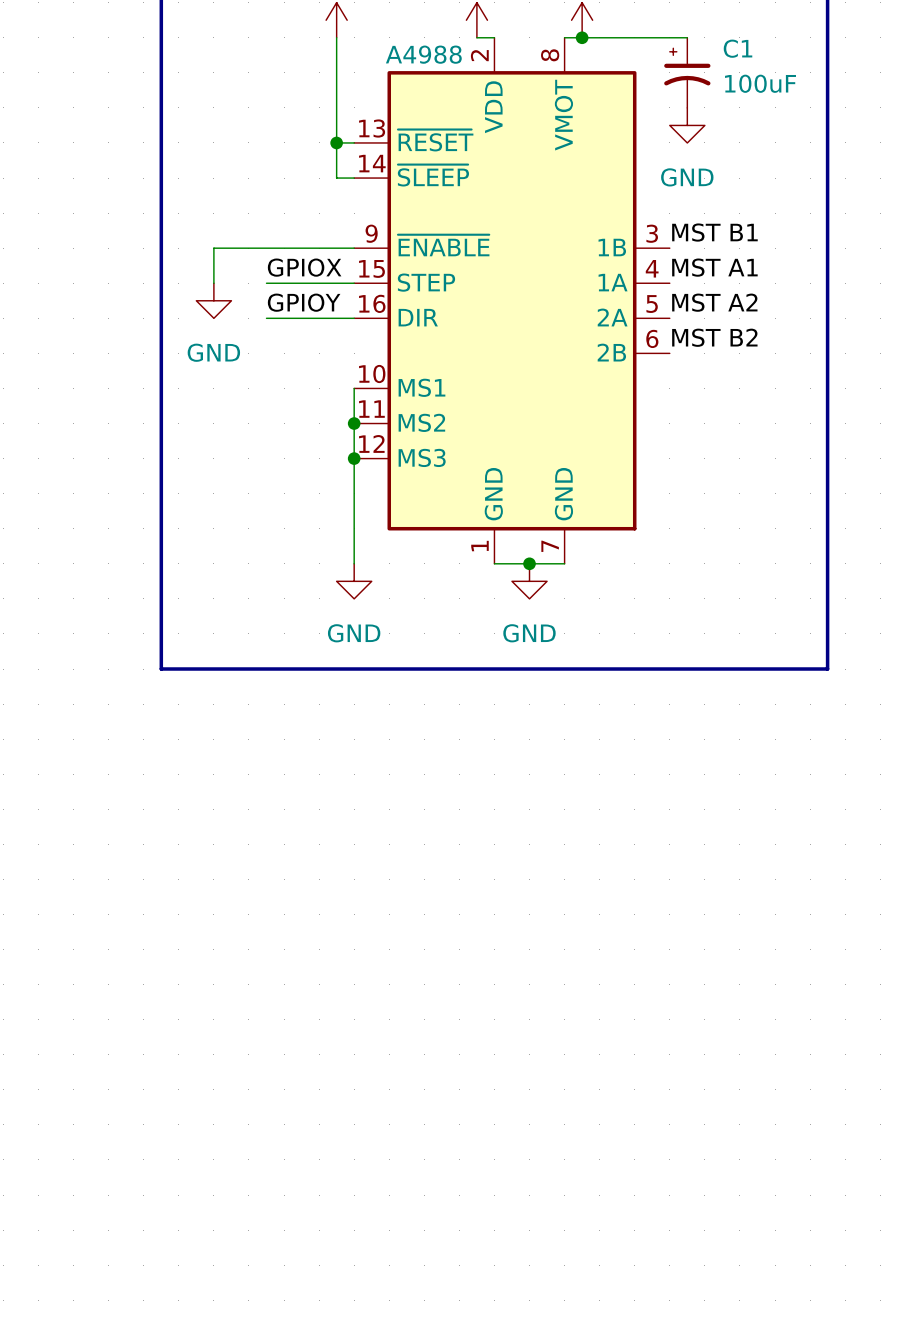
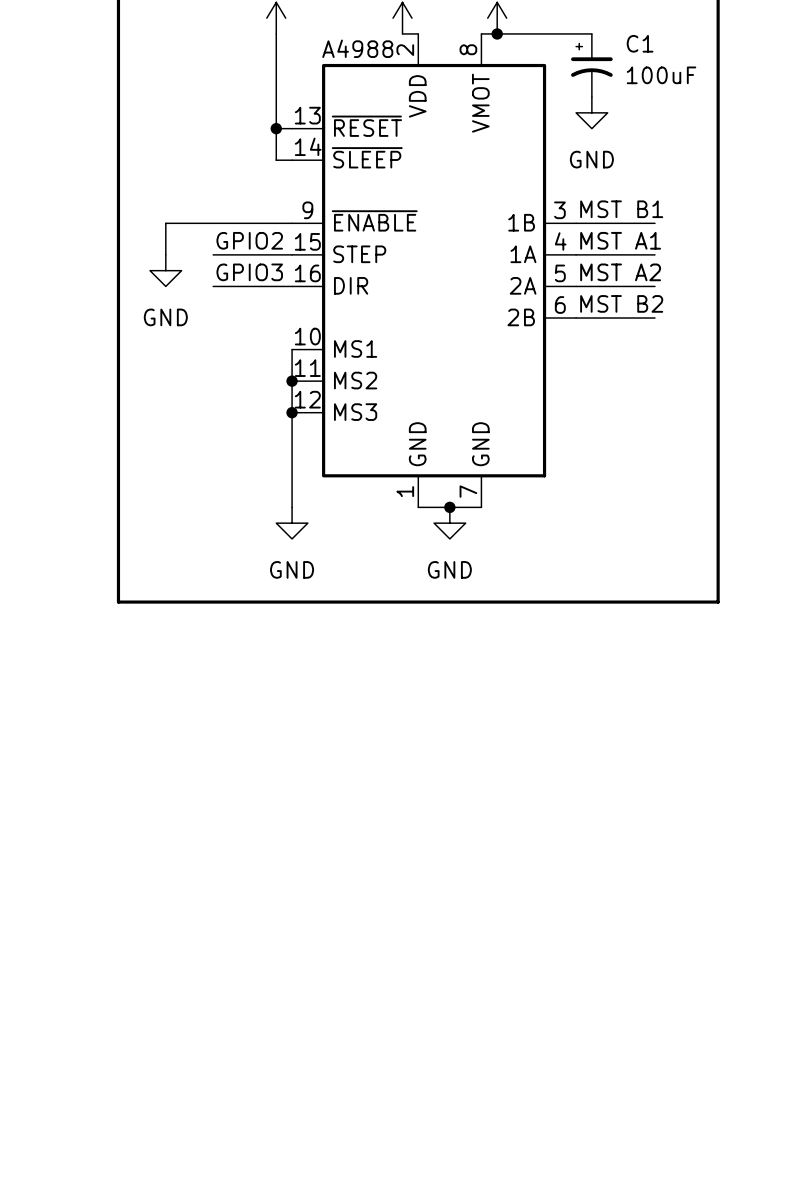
wire: none -> (576, 223) (655, 223)
label: GPIOX (304, 267) -> GPIO2 (249, 240)
wire: none -> (576, 254) (655, 254)
label: GPIOY (304, 302) -> GPIO3 (249, 272)
wire: none -> (576, 286) (655, 286)
wire: none -> (576, 318) (655, 318)

